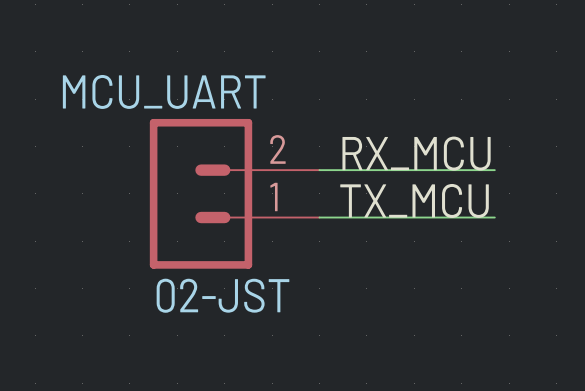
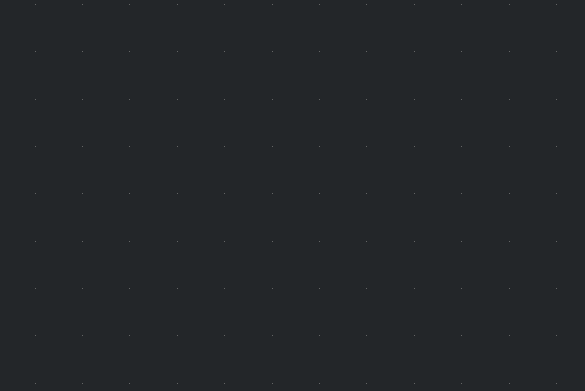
label: RX_MCU (416, 153) -> none
wire: (319, 170) (494, 170) -> none
MCU_UART: 02-JST (234, 193) -> none
label: TX_MCU (414, 200) -> none
wire: (319, 217) (494, 217) -> none

